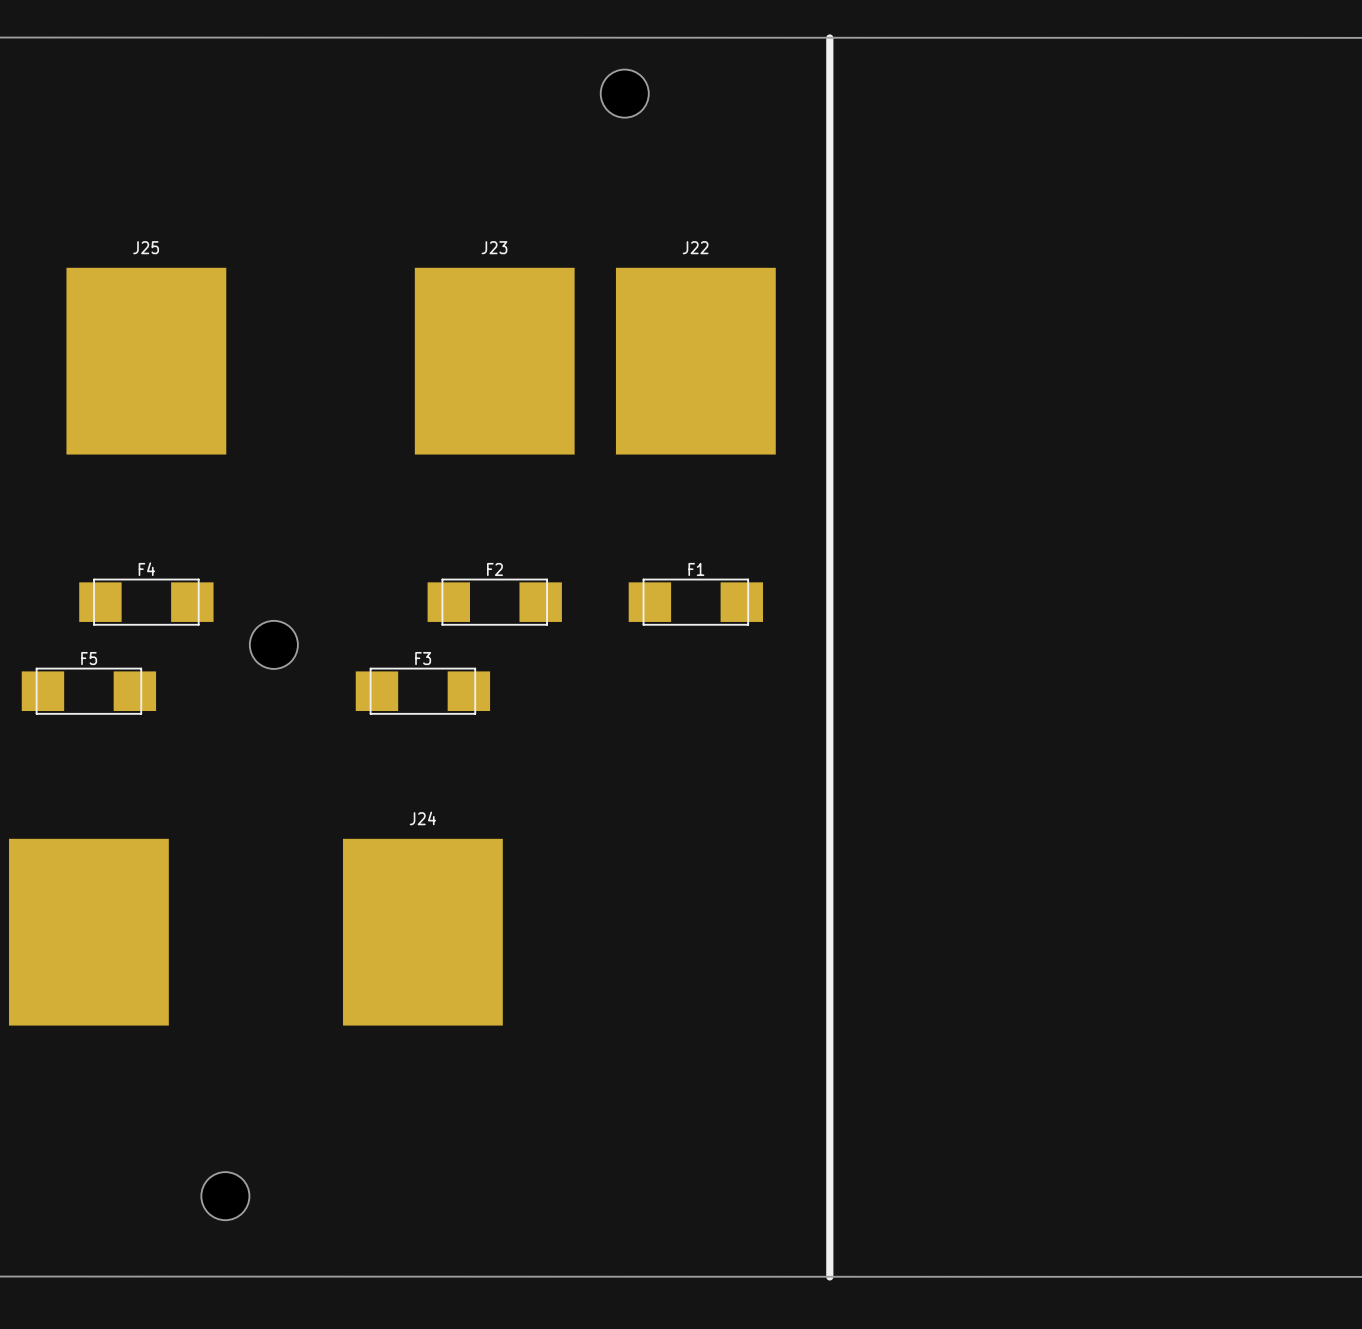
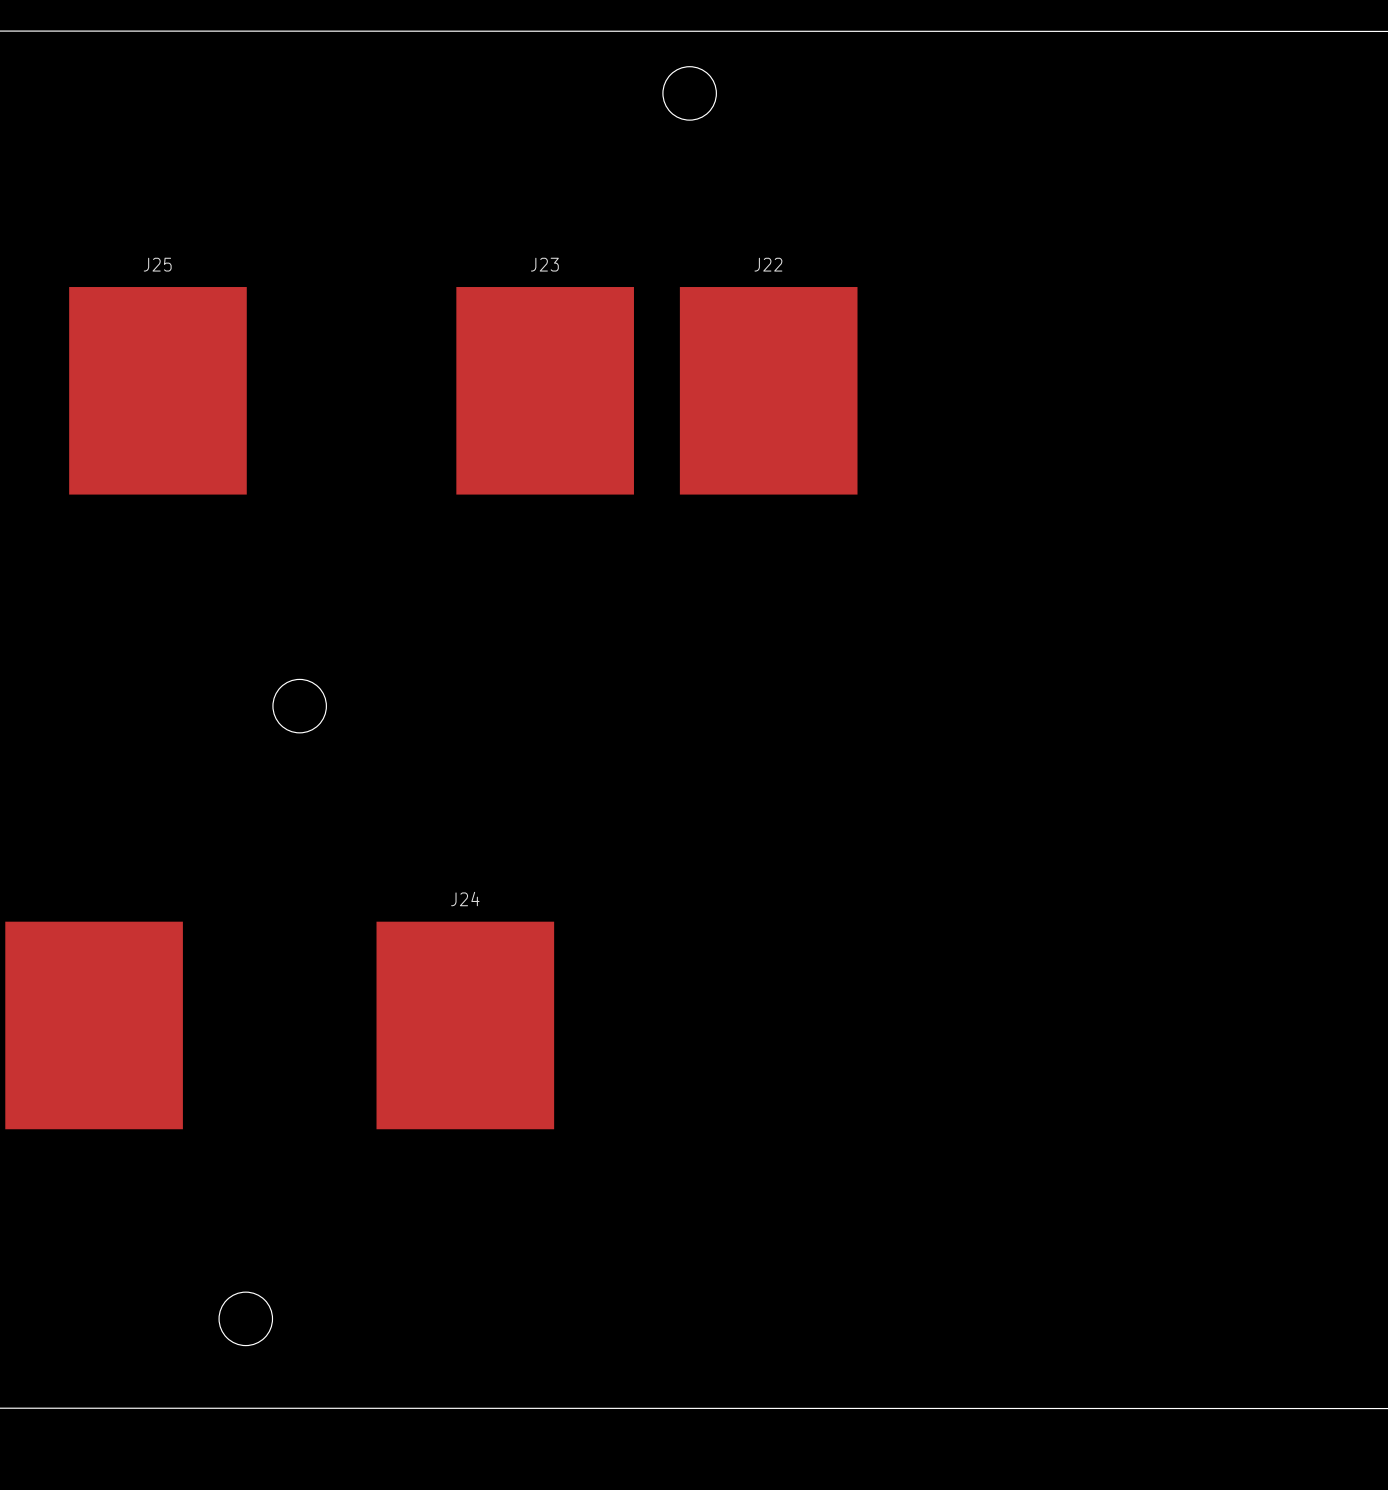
line: (829, 37) (829, 1276) -> none
F4: (146, 602) -> none
F2: (494, 602) -> none
F1: (695, 602) -> none
F5: (88, 691) -> none
F3: (422, 691) -> none

